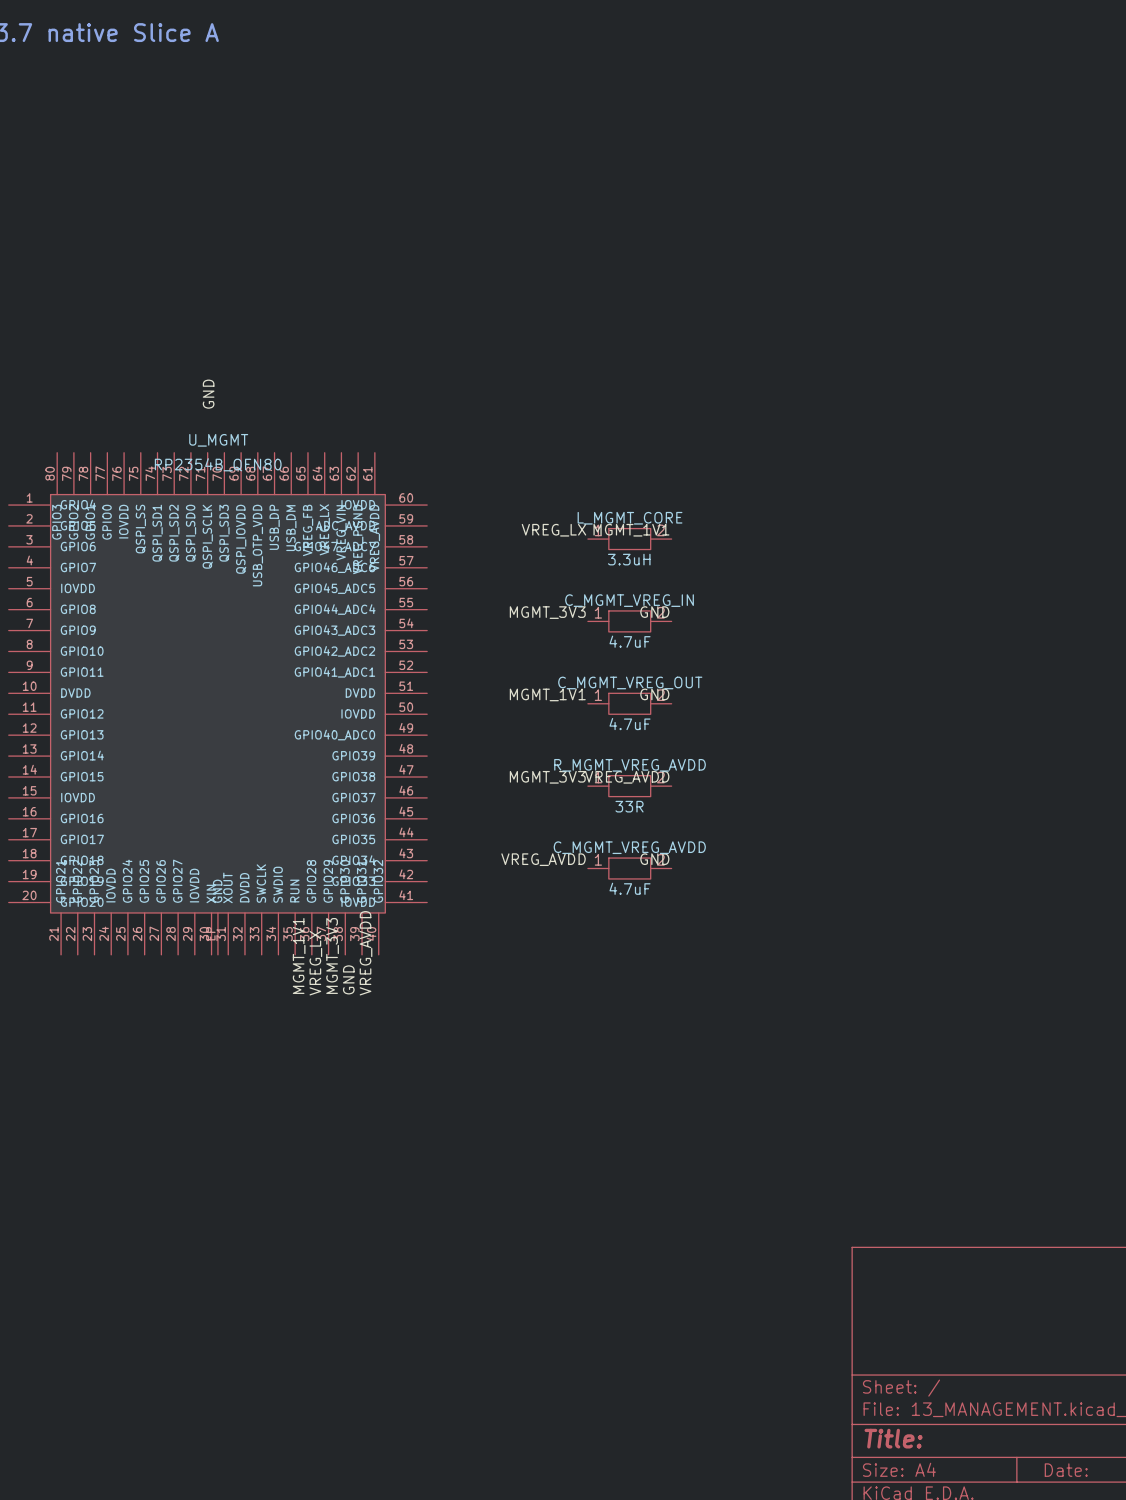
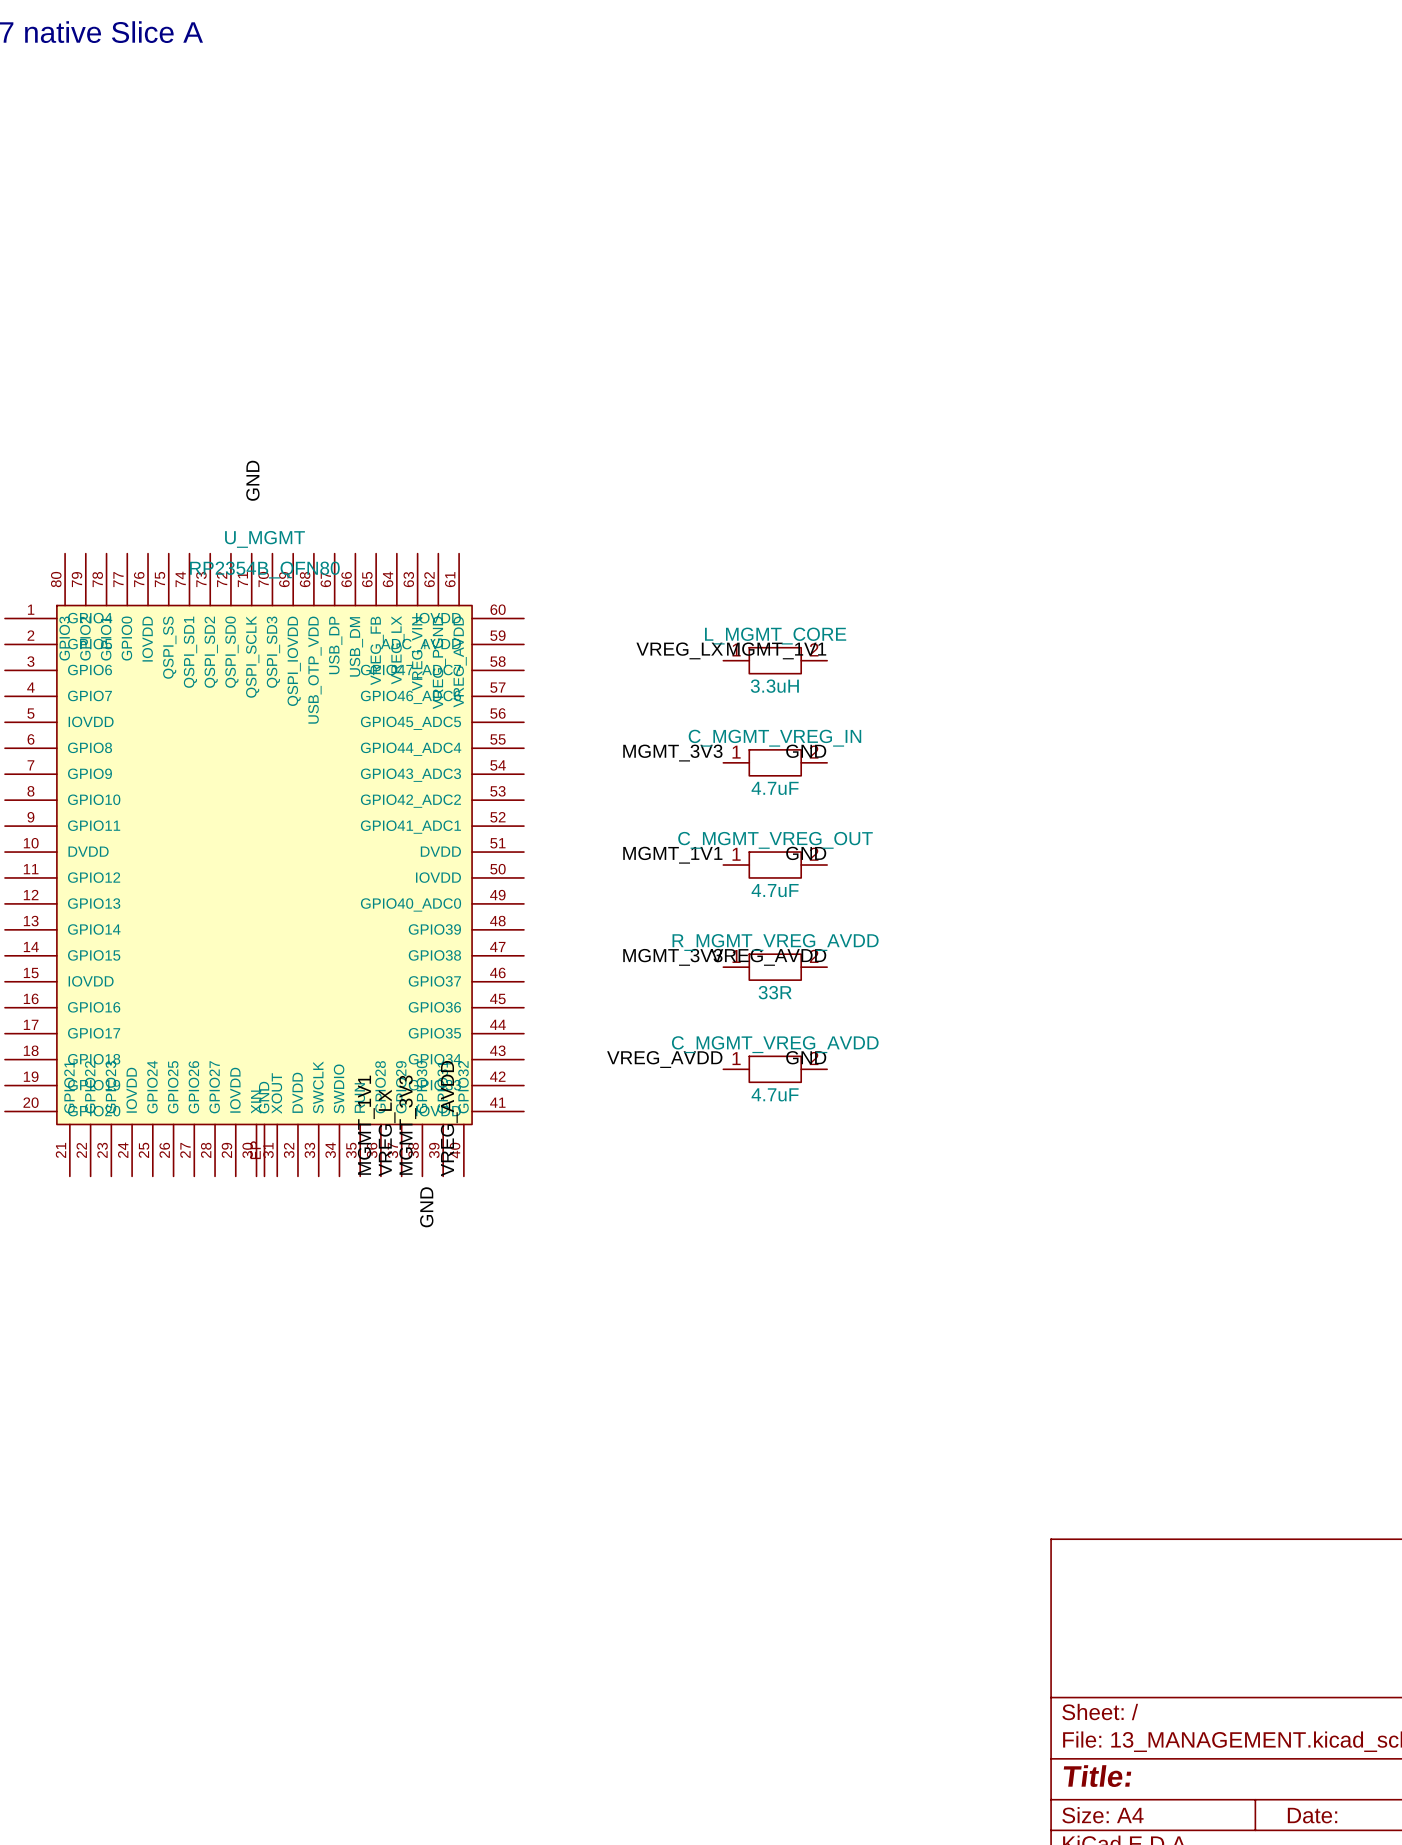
label position: VREG_AVDD (366, 953) -> VREG_AVDD (449, 1118)
label position: MGMT_1V1 (299, 955) -> MGMT_1V1 (366, 1125)
label position: MGMT_3V3 (332, 955) -> MGMT_3V3 (407, 1125)
label position: VREG_LX (315, 963) -> VREG_LX (387, 1133)

